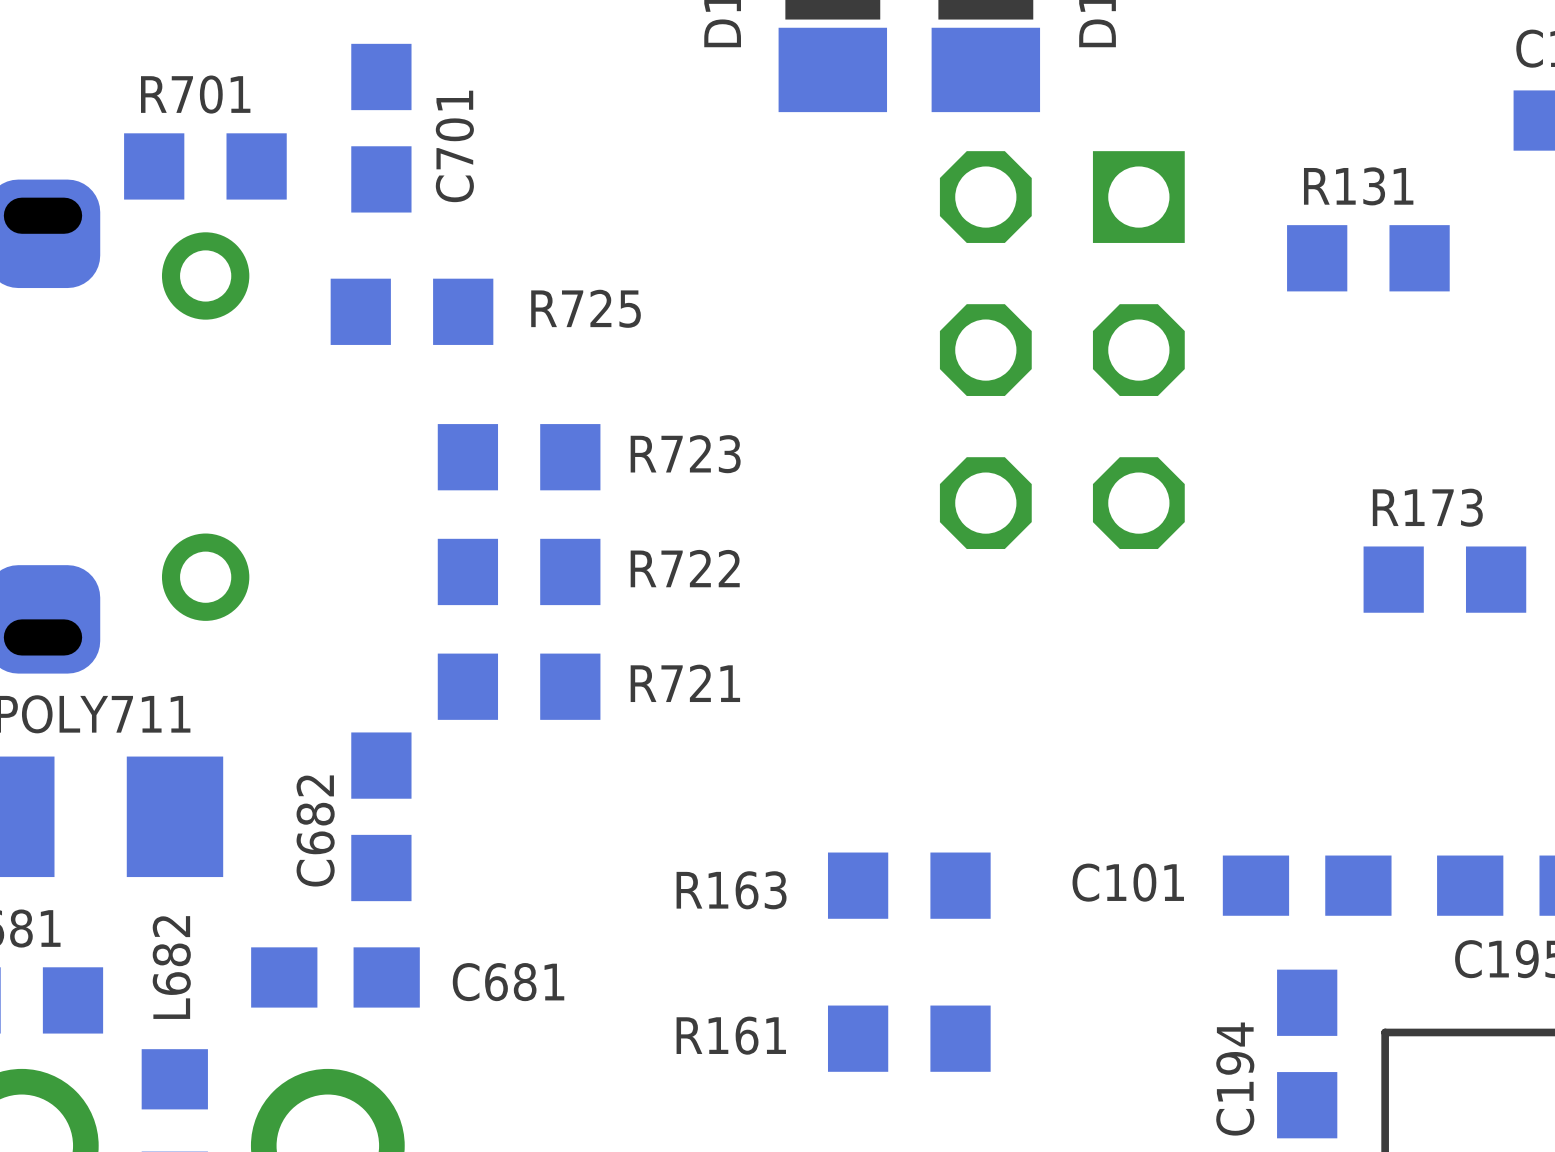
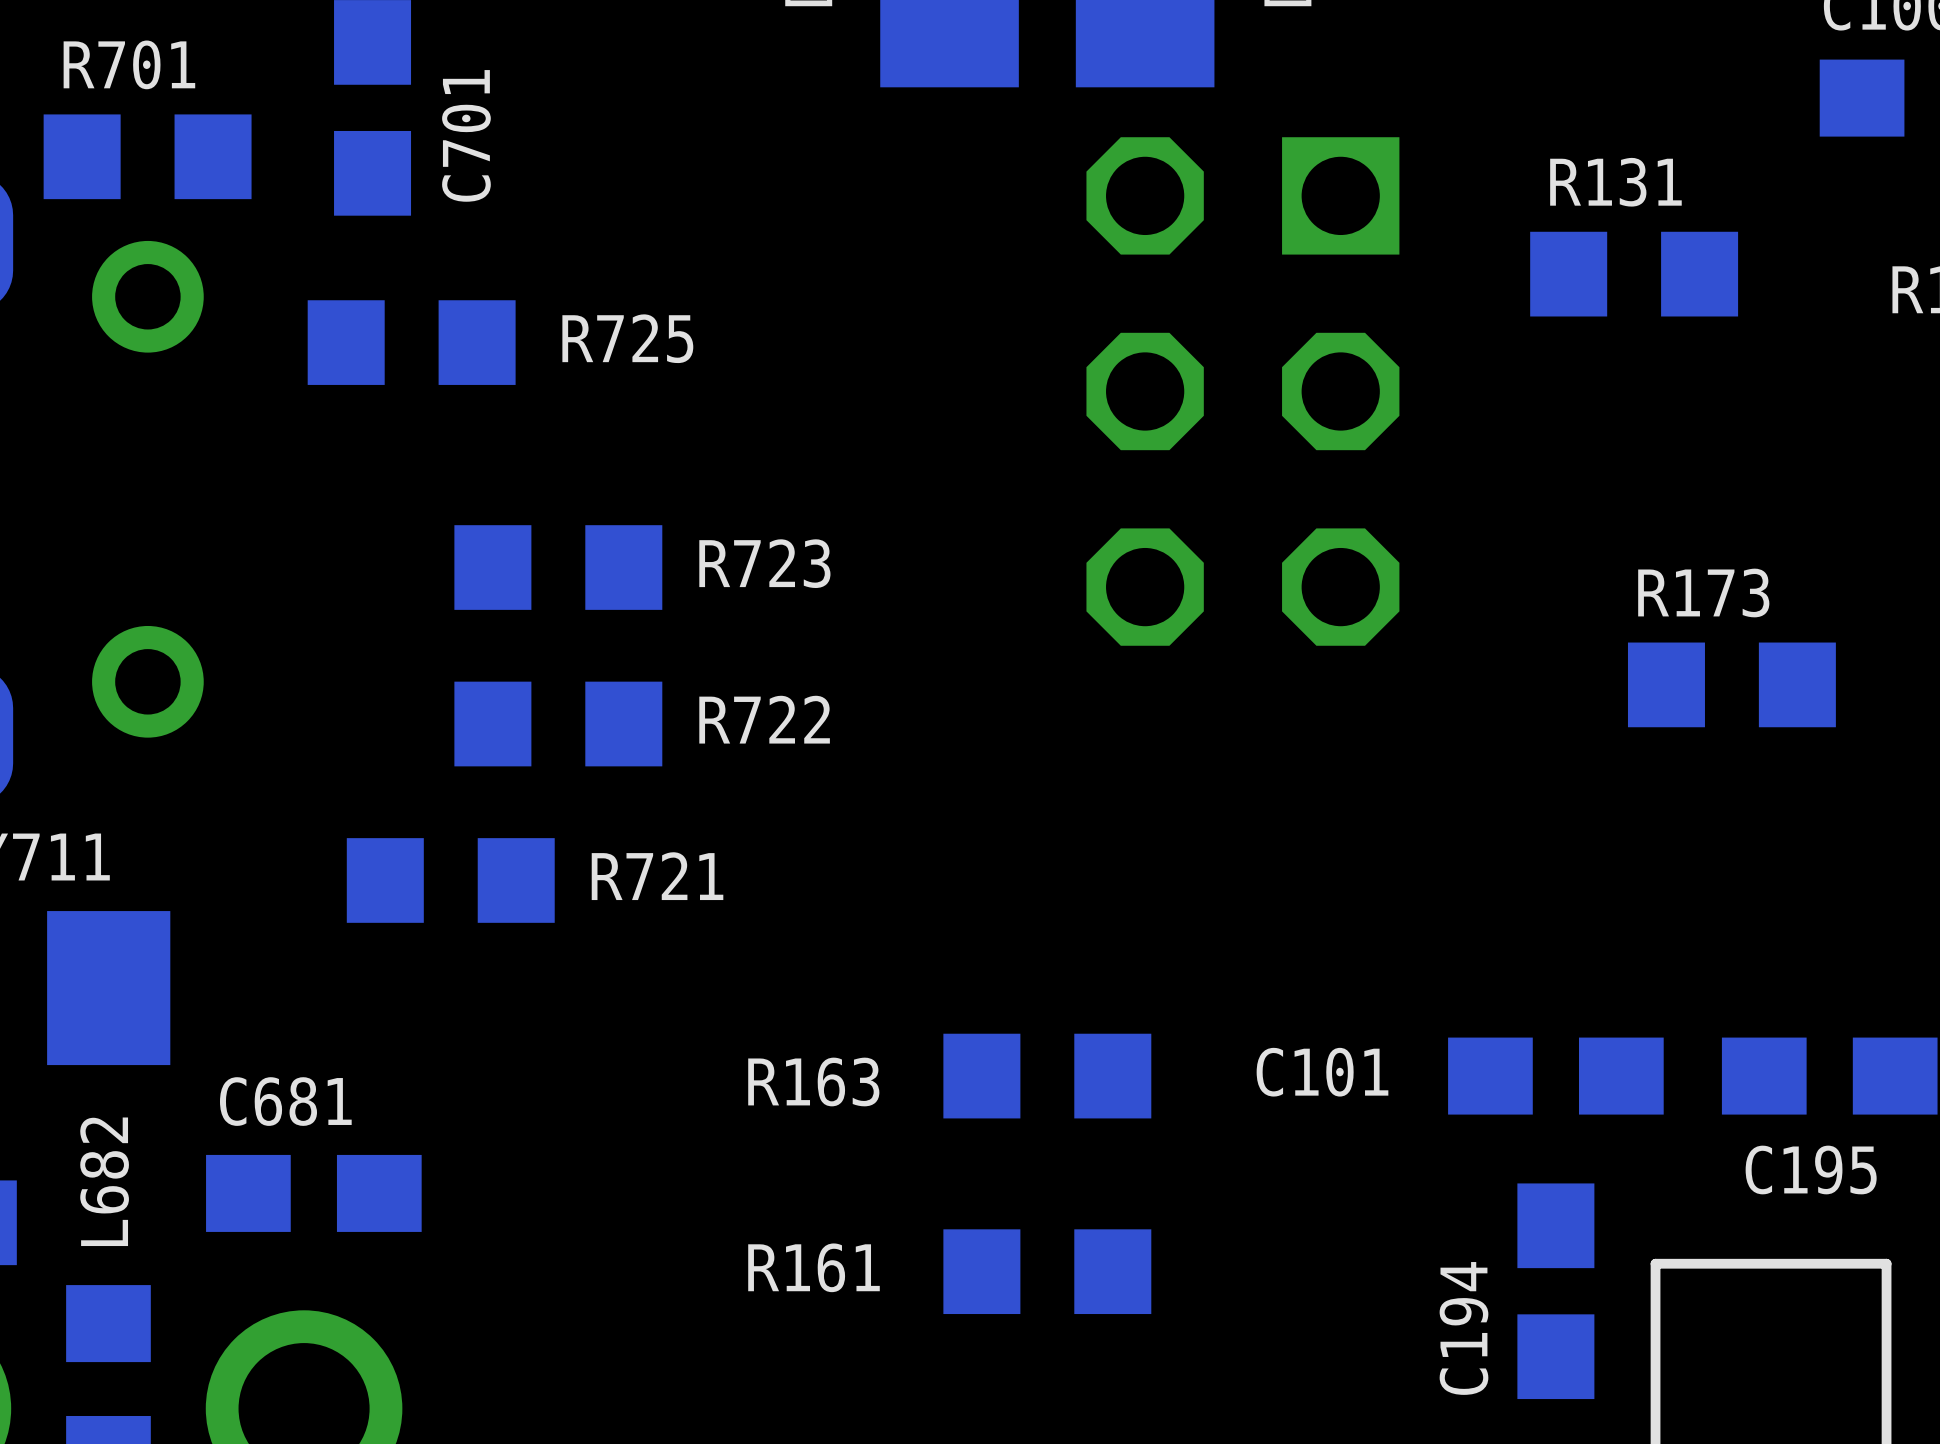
R723 position: (519, 457) -> (558, 567)
R722 position: (519, 571) -> (558, 724)
R721 position: (519, 686) -> (450, 880)
C682: (381, 816) -> none
C681 name position: C681 (508, 982) -> C681 (285, 1101)

